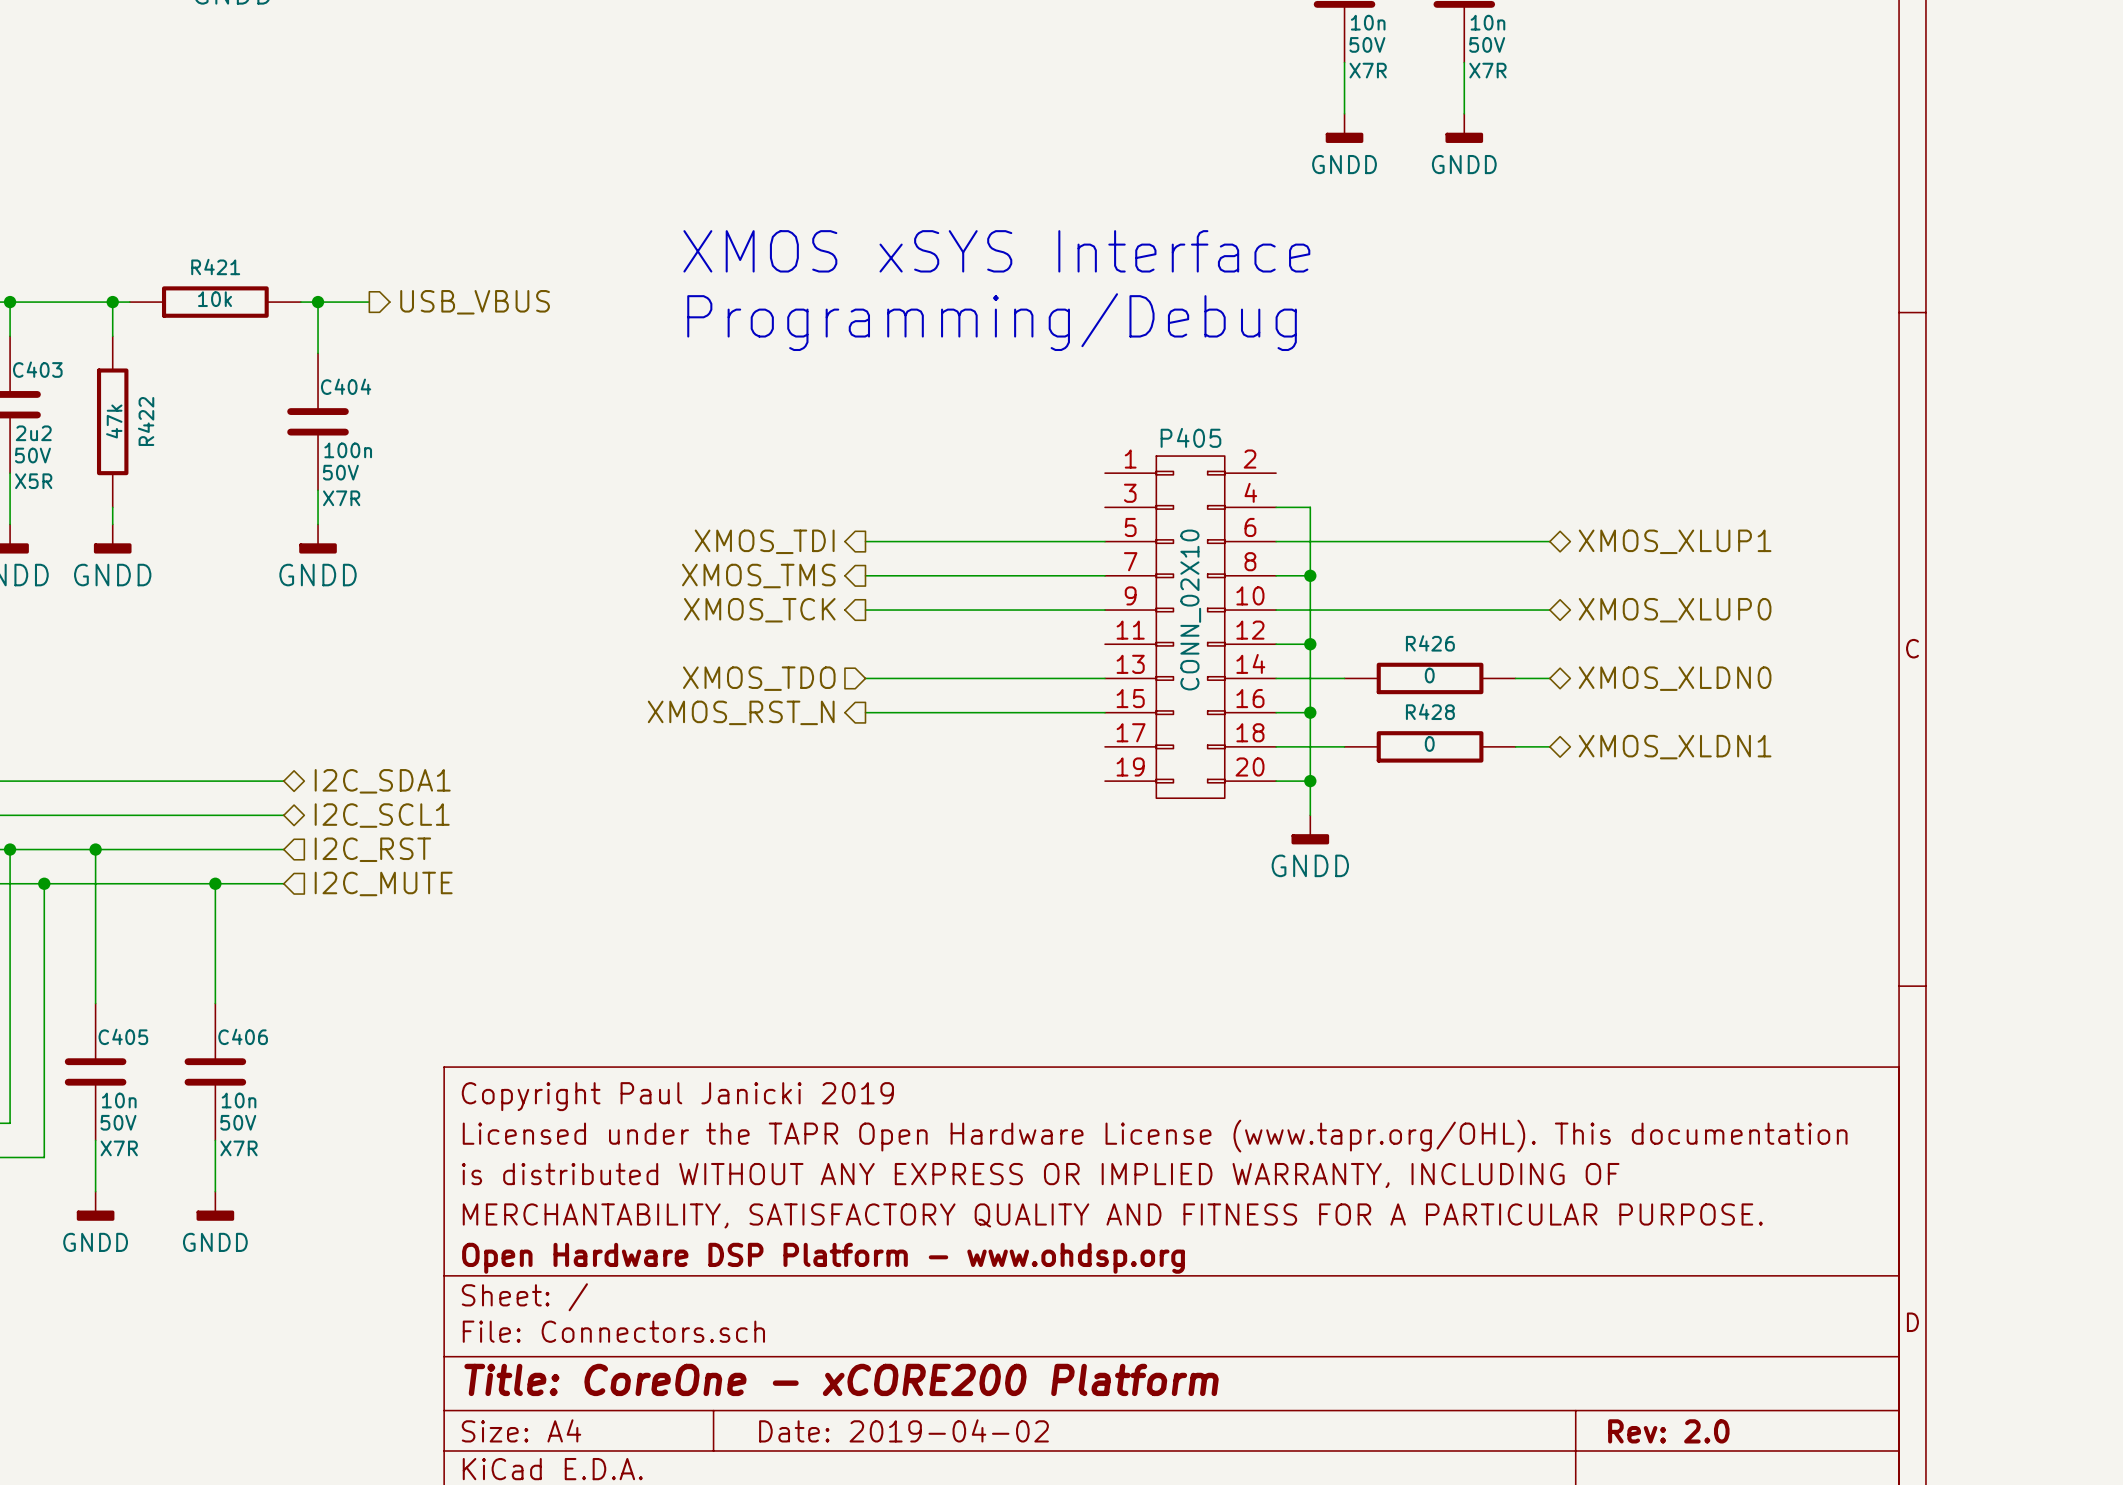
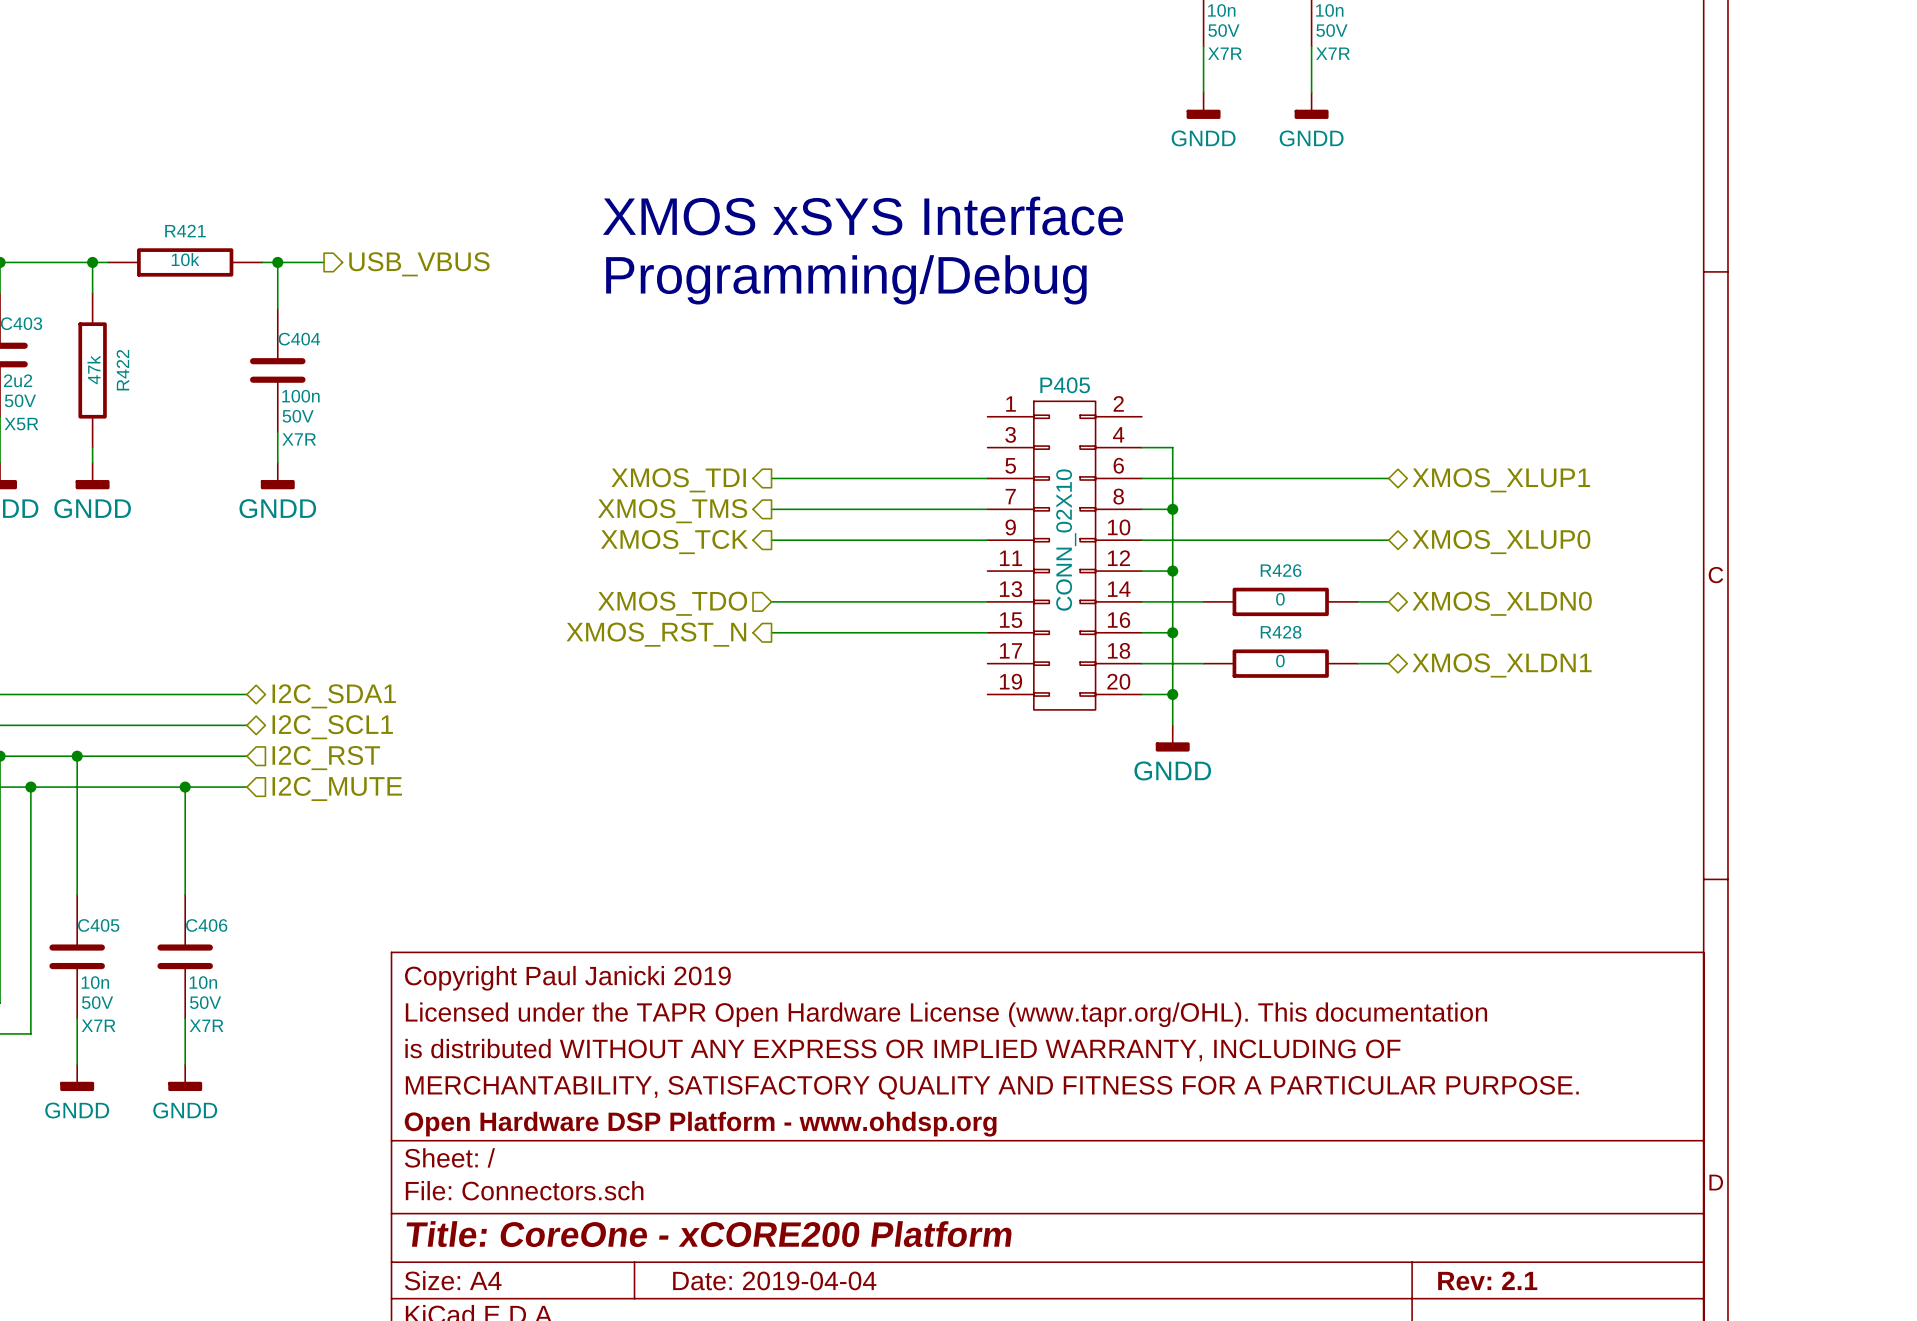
title block: Date: 2019-04-02 (903, 1430) -> Date: 2019-04-04 (774, 1280)
title block: Rev: 2.0 (1668, 1431) -> Rev: 2.1 (1487, 1280)

